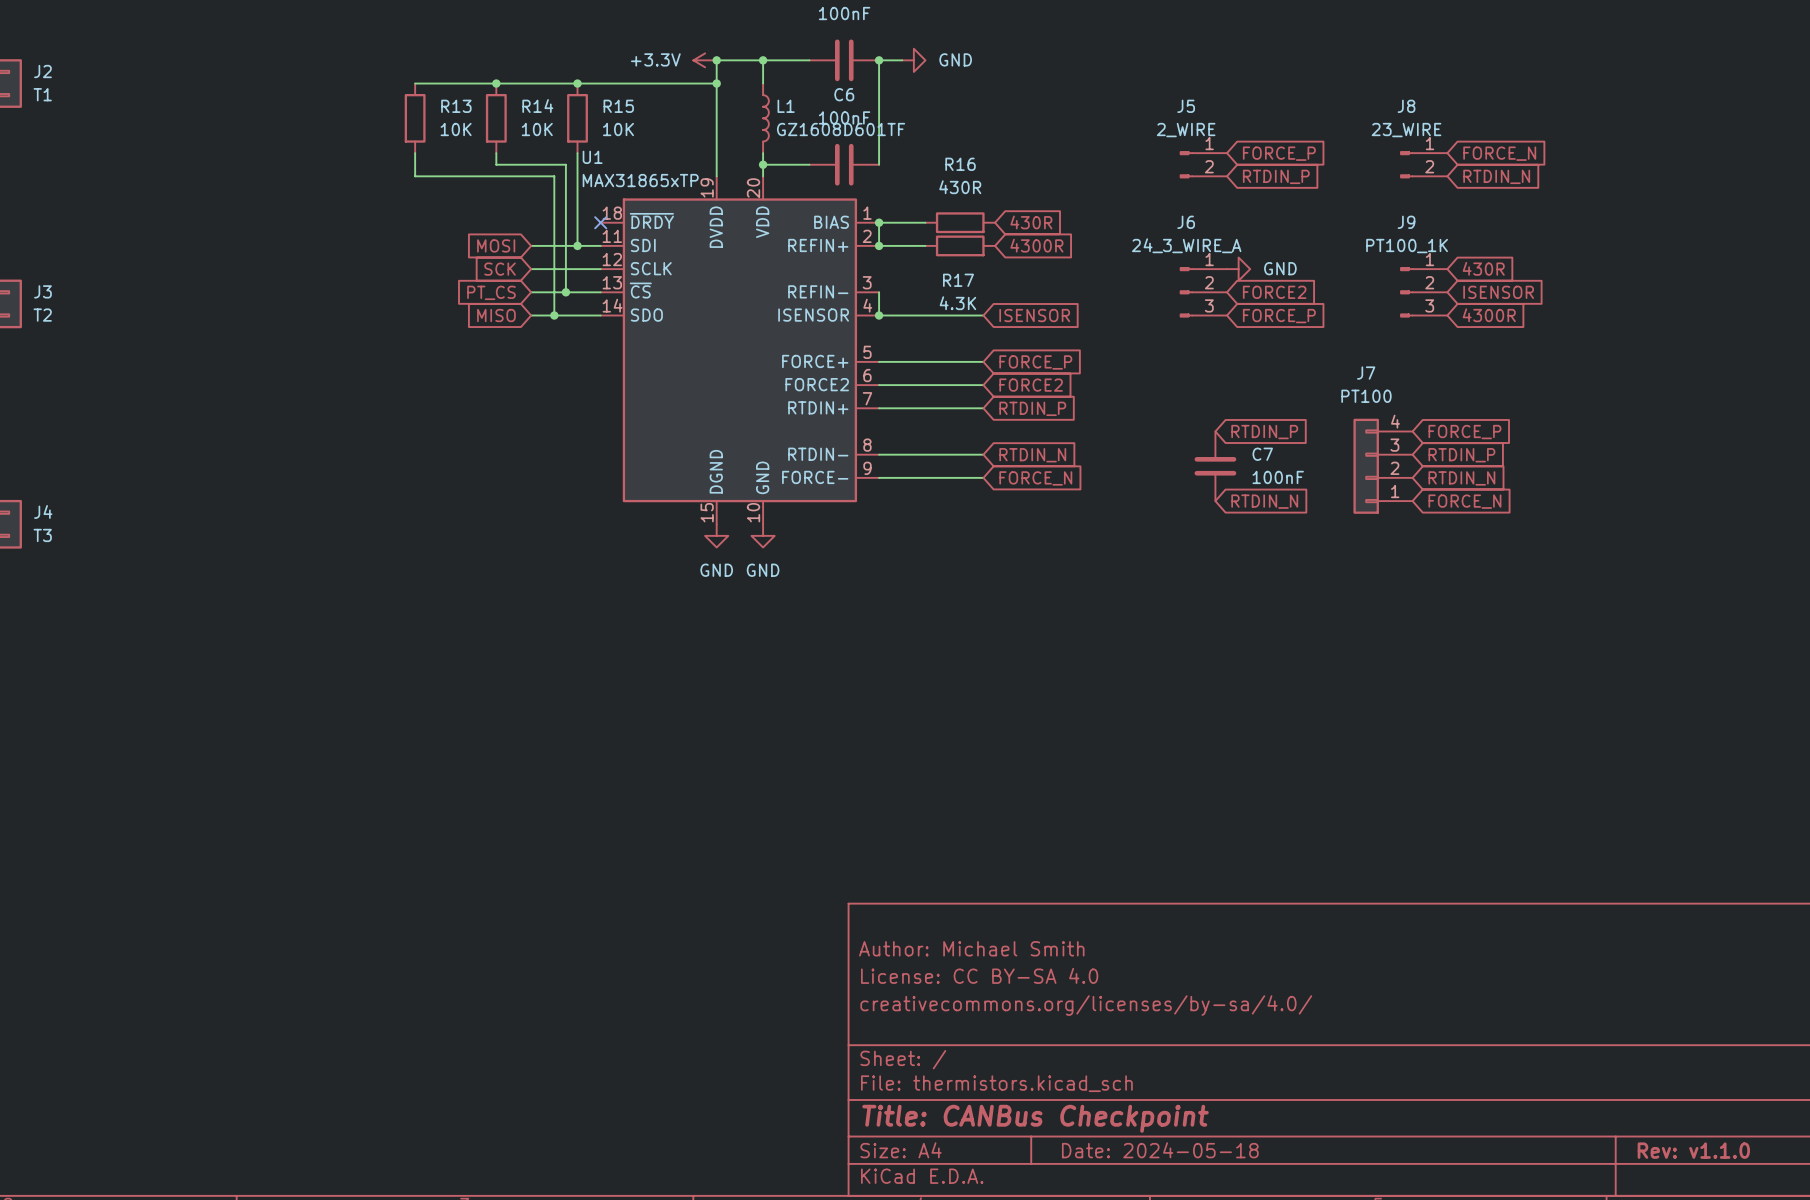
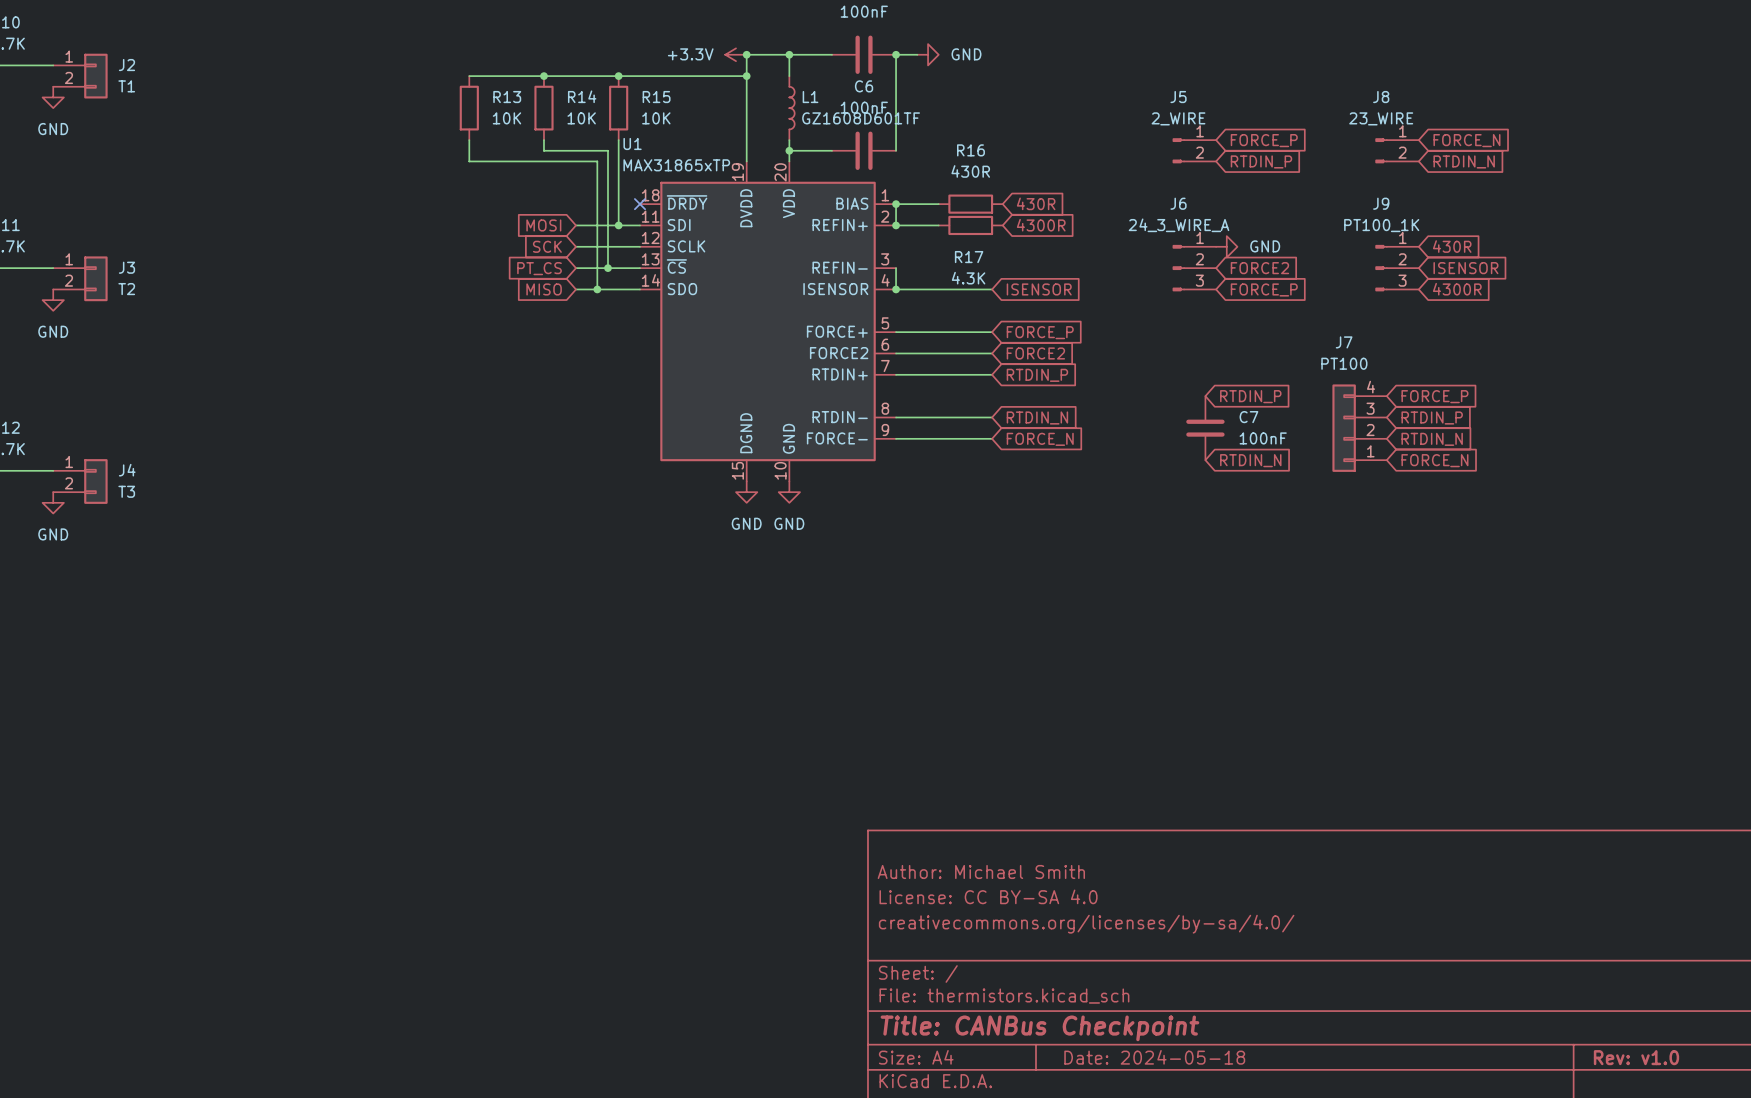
title block: Rev: v1.1.0 (1693, 1150) -> Rev: v1.0 (1636, 1057)

